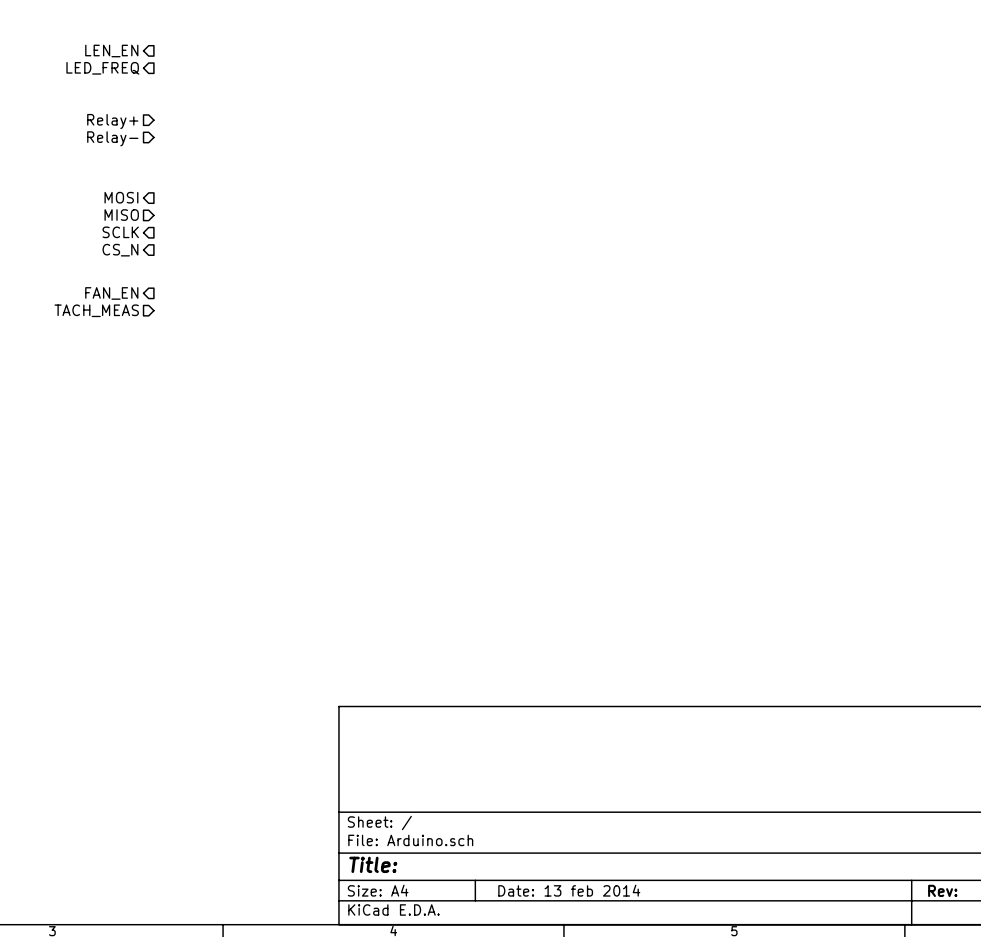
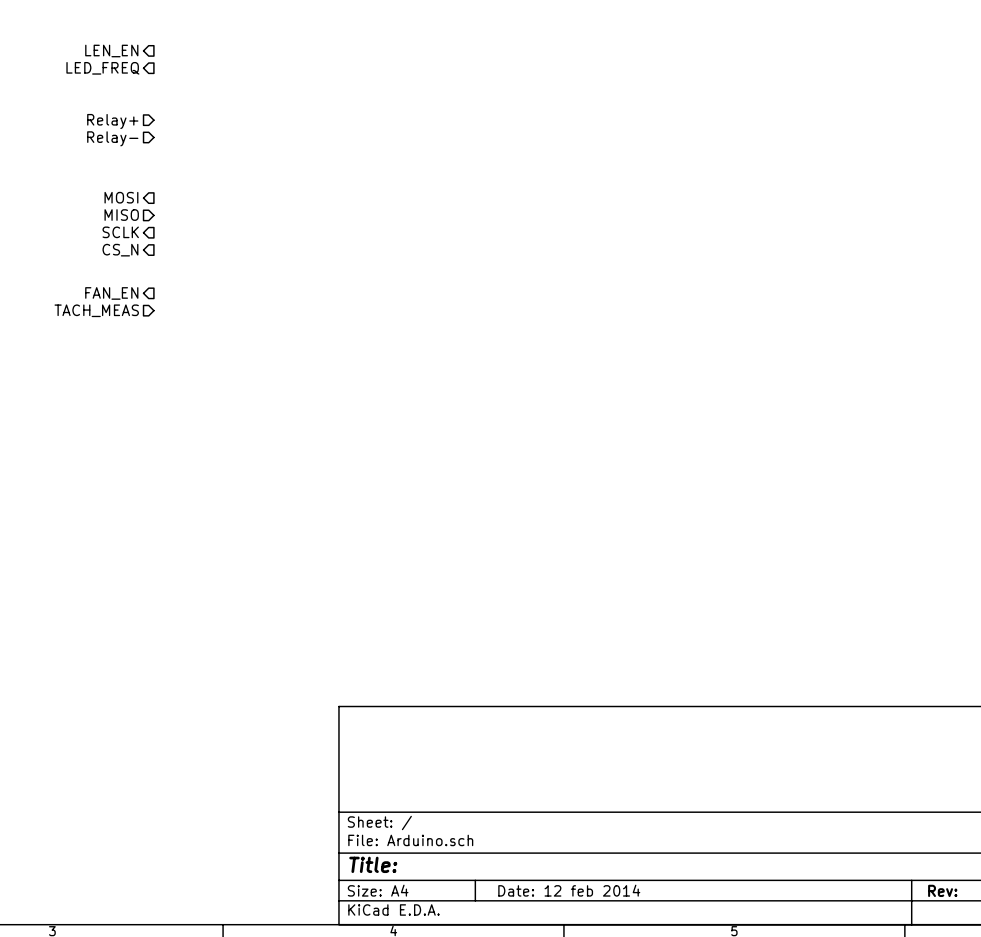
title block: Date: 13 feb 2014 (569, 890) -> Date: 12 feb 2014 (569, 890)

